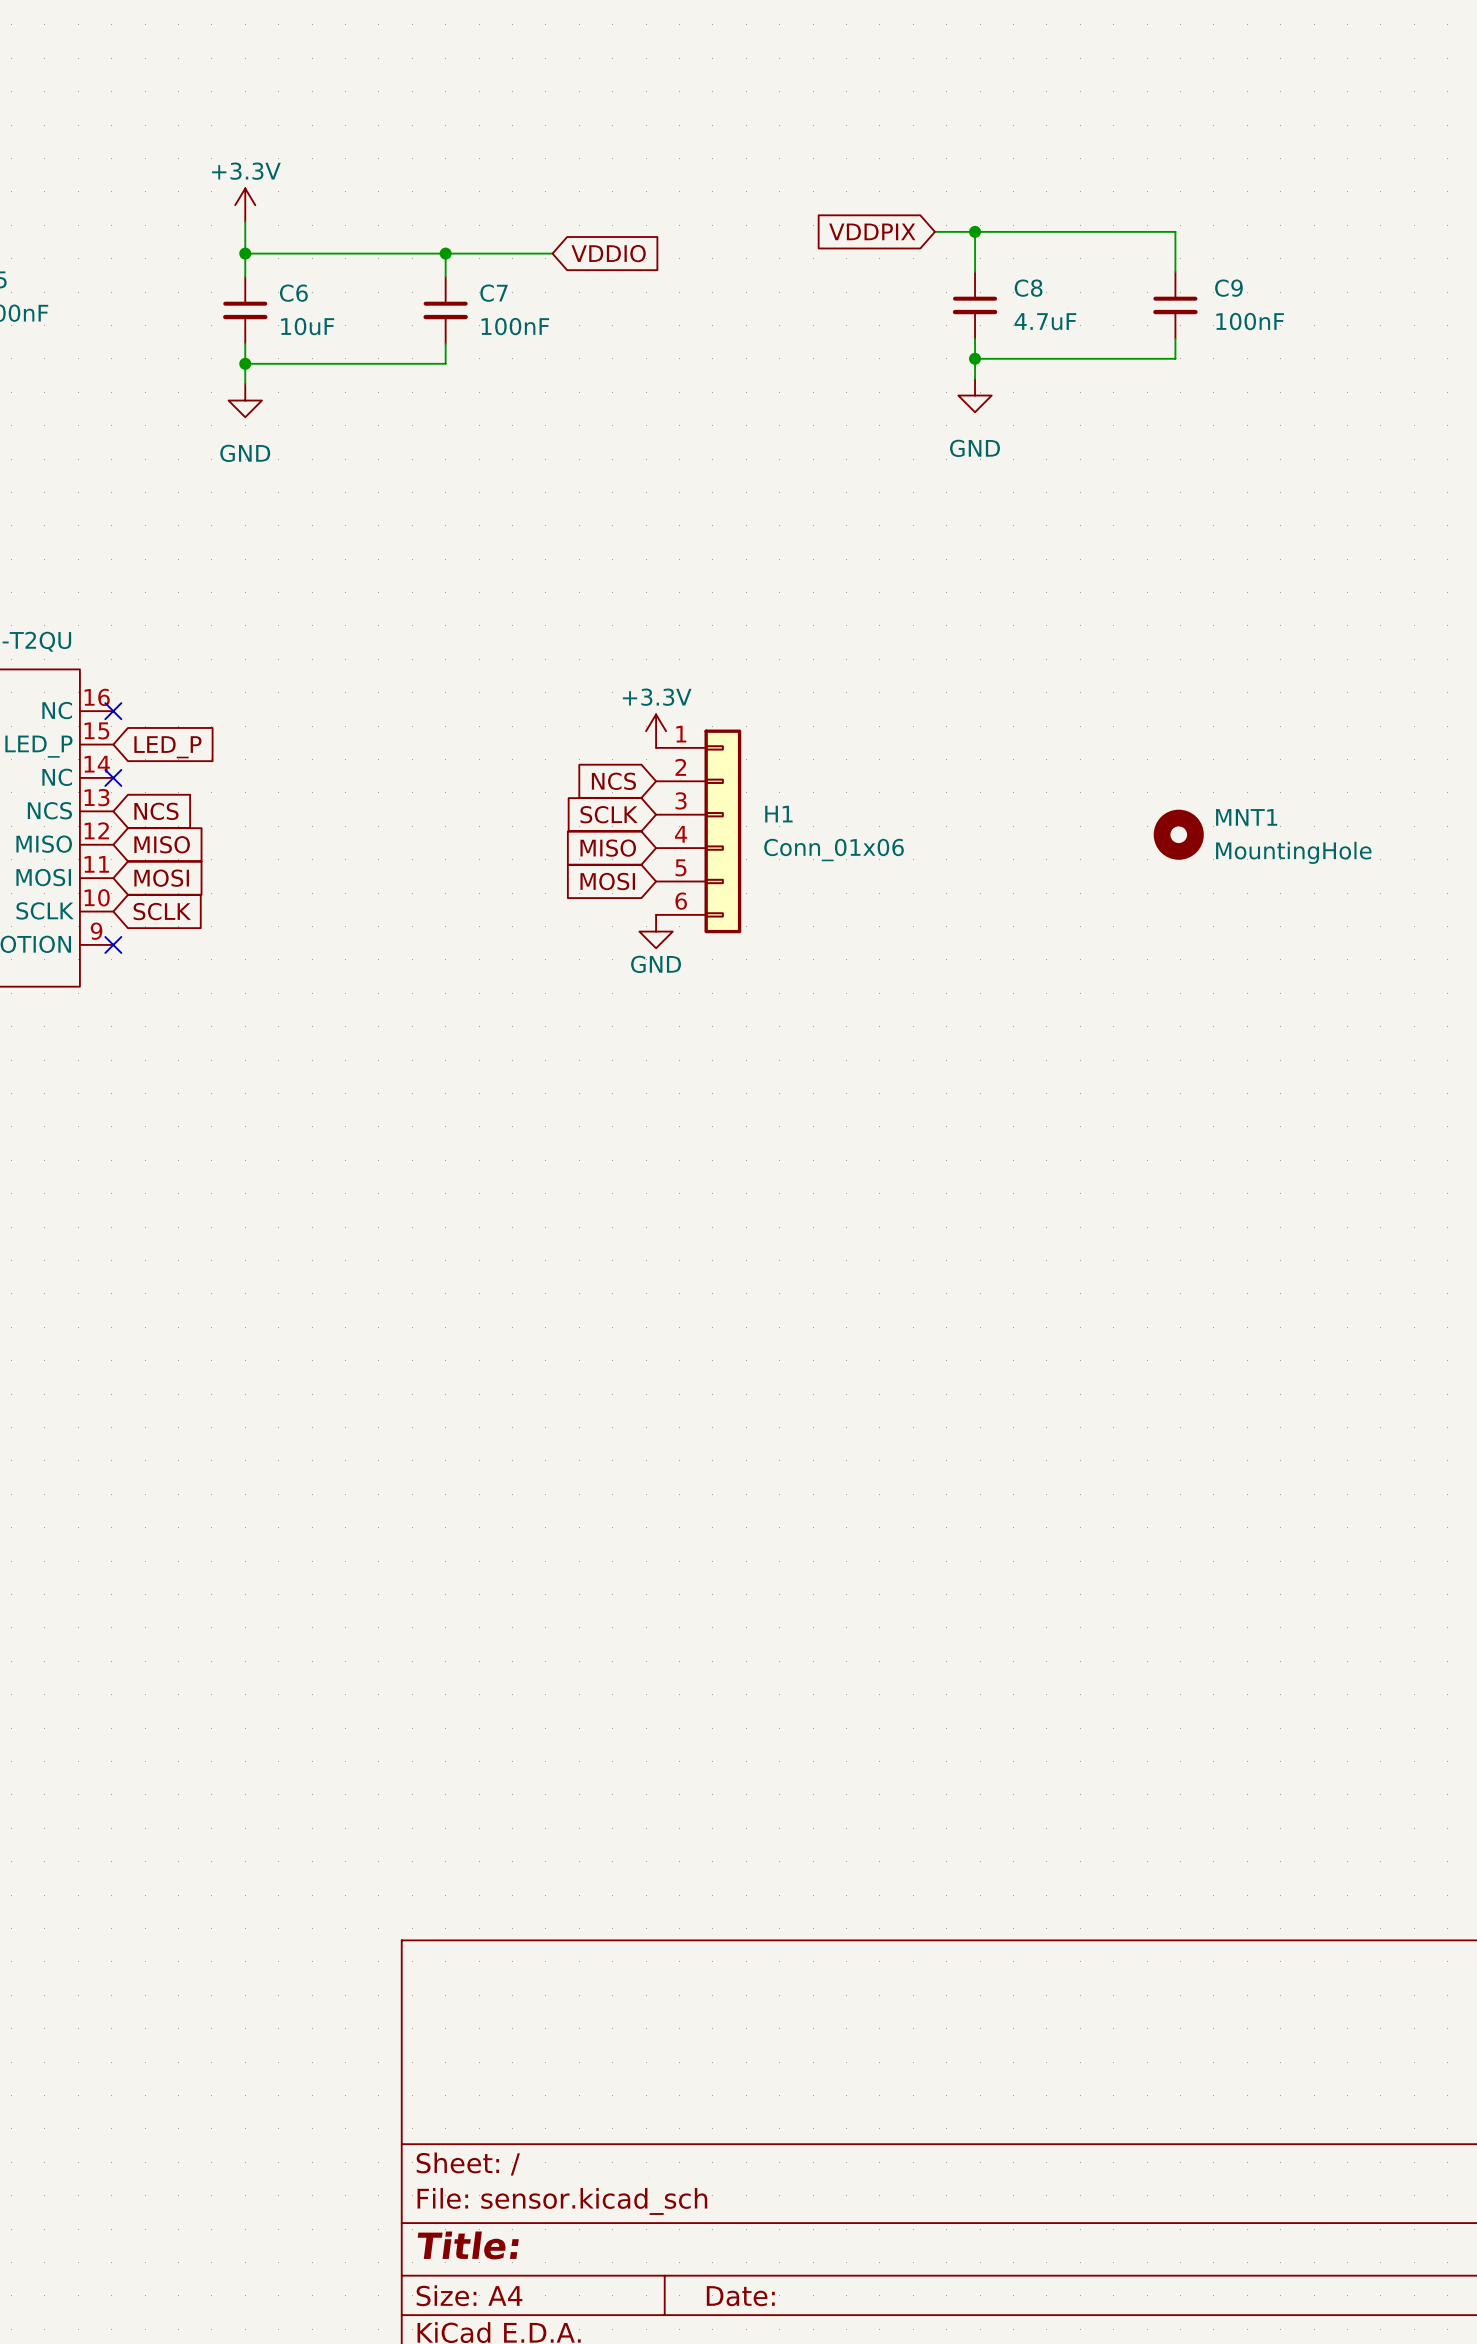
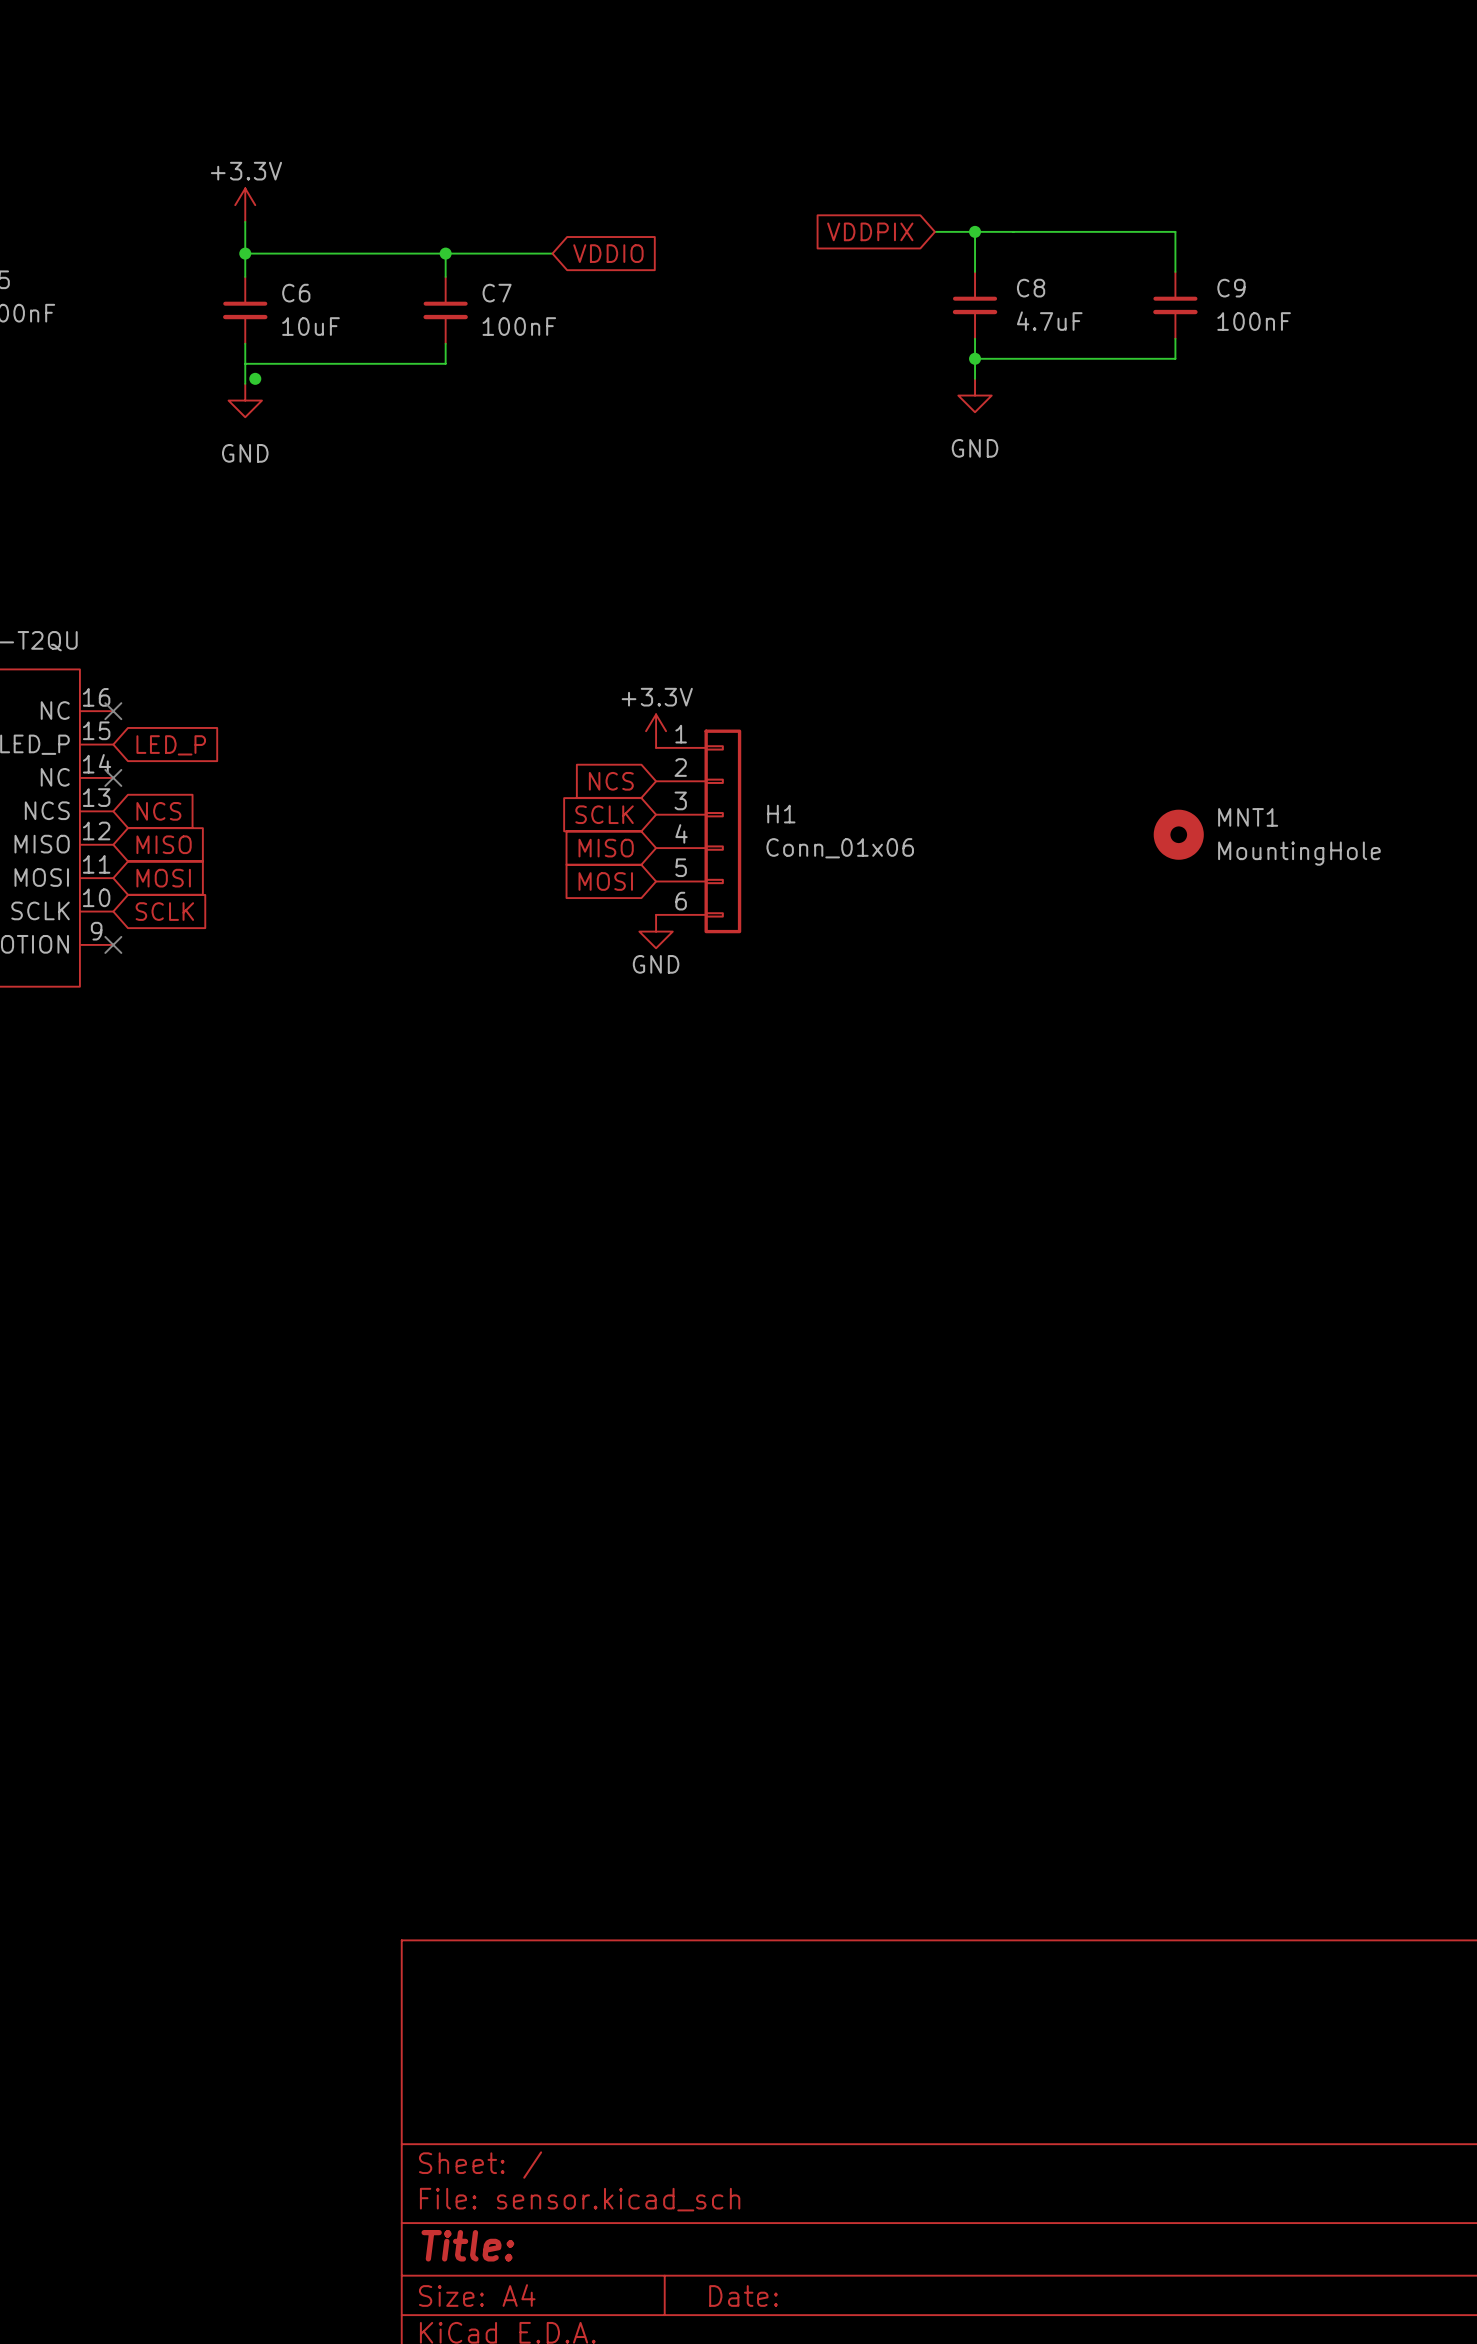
junction position: (245, 363) -> (255, 378)

